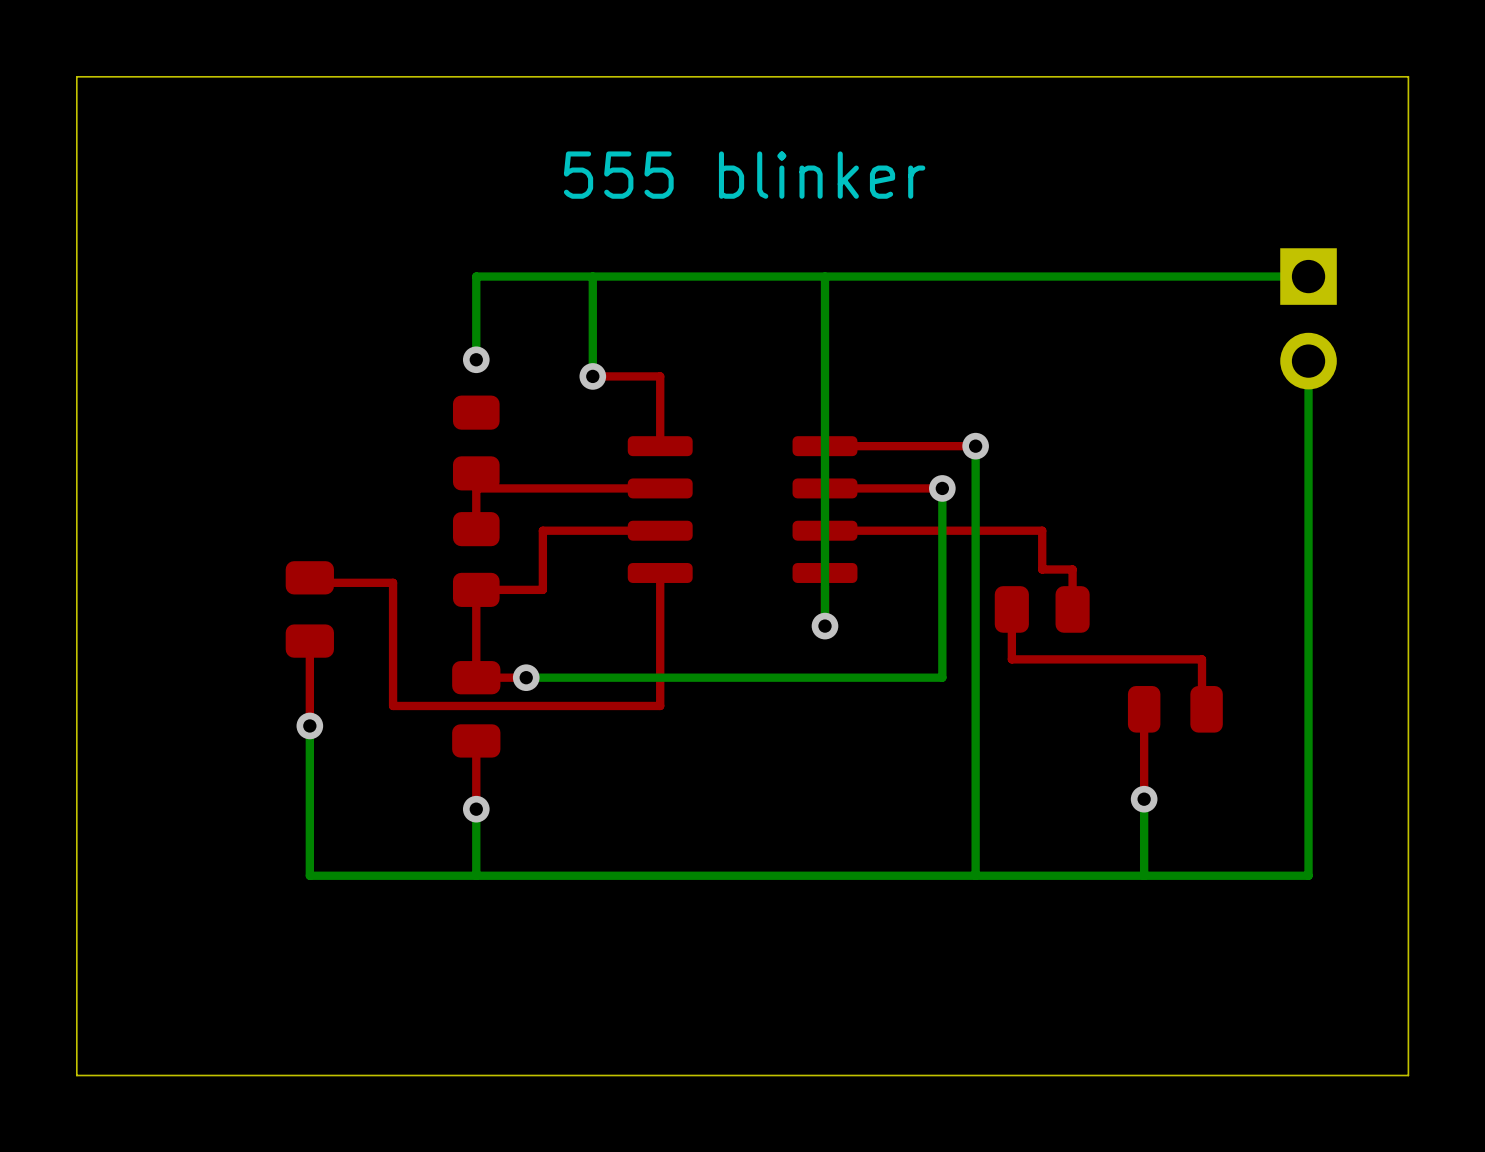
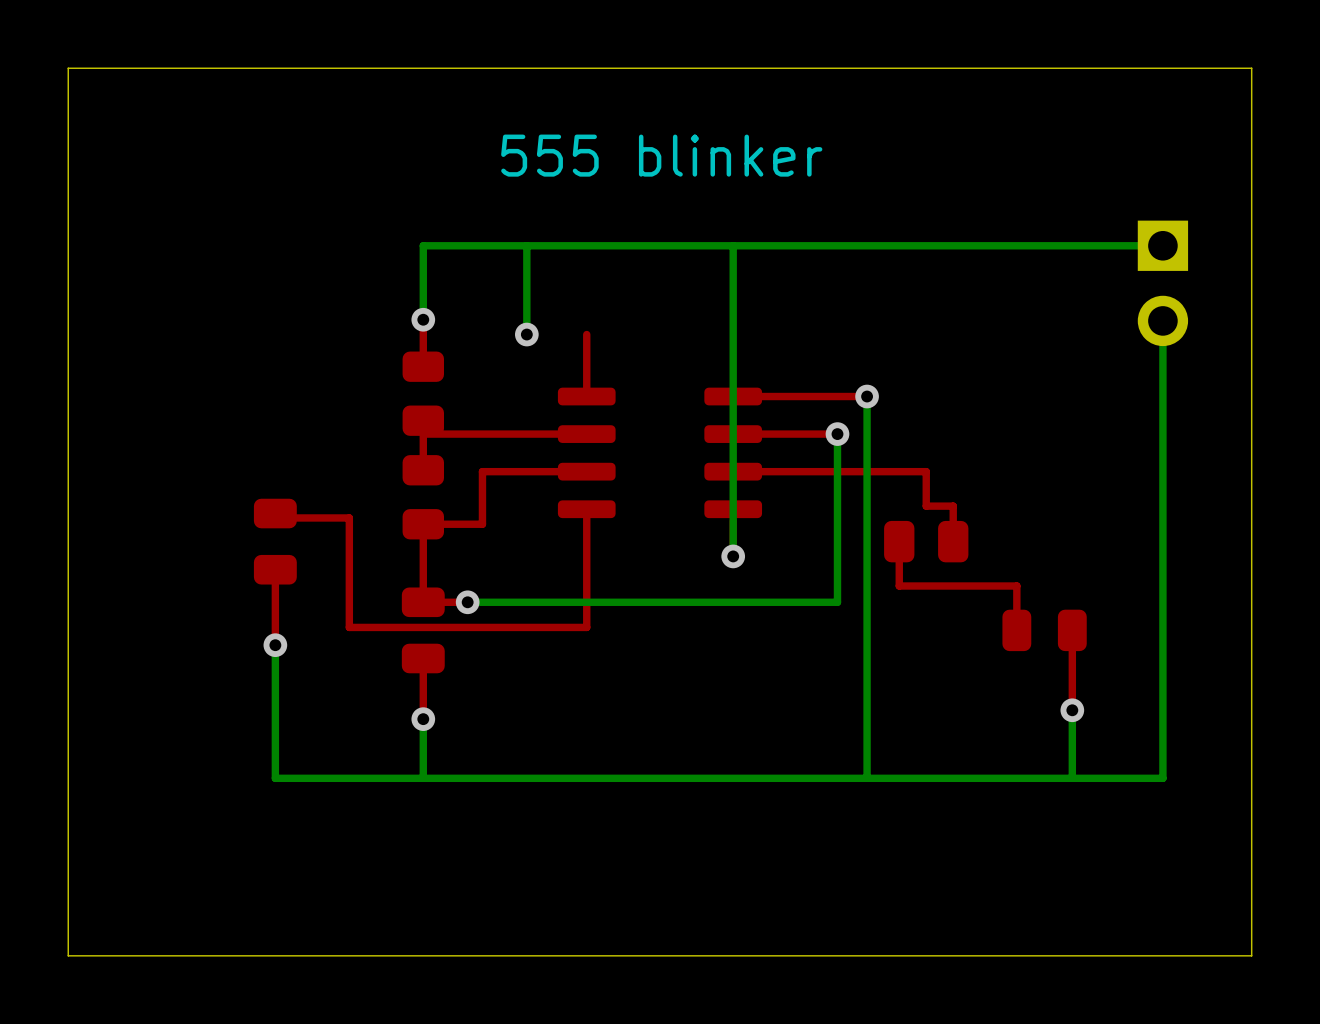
top track: none -> (423, 319) (423, 355)
top track: (660, 376) (592, 376) -> none
top track: (1144, 659) (1202, 659) (1202, 705) -> (1016, 586) (1016, 627)
top track: (1144, 725) (1144, 799) -> (1072, 645) (1072, 710)
bottom track: (1144, 799) (1144, 875) -> (1072, 710) (1072, 778)
via position: (1144, 799) -> (1072, 710)

